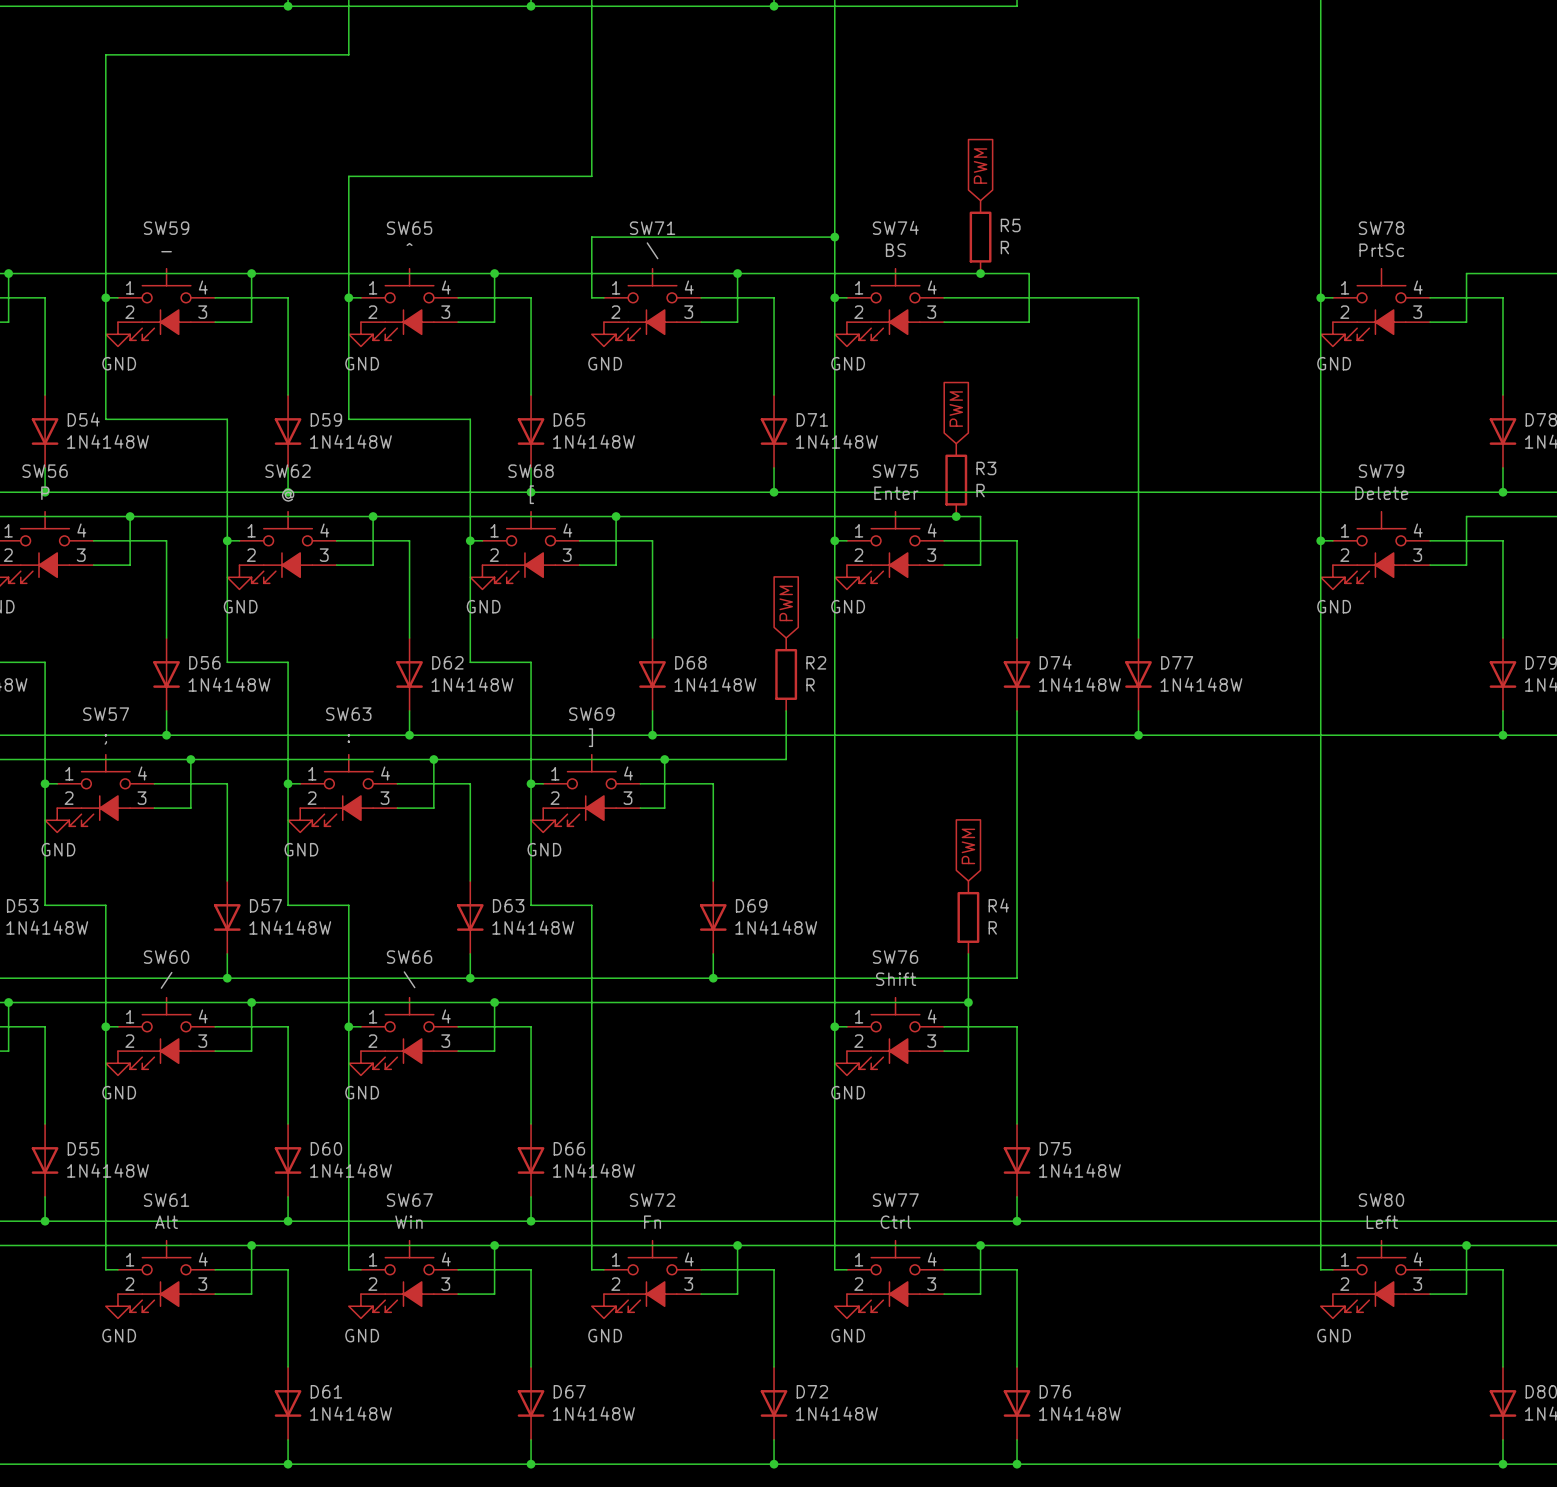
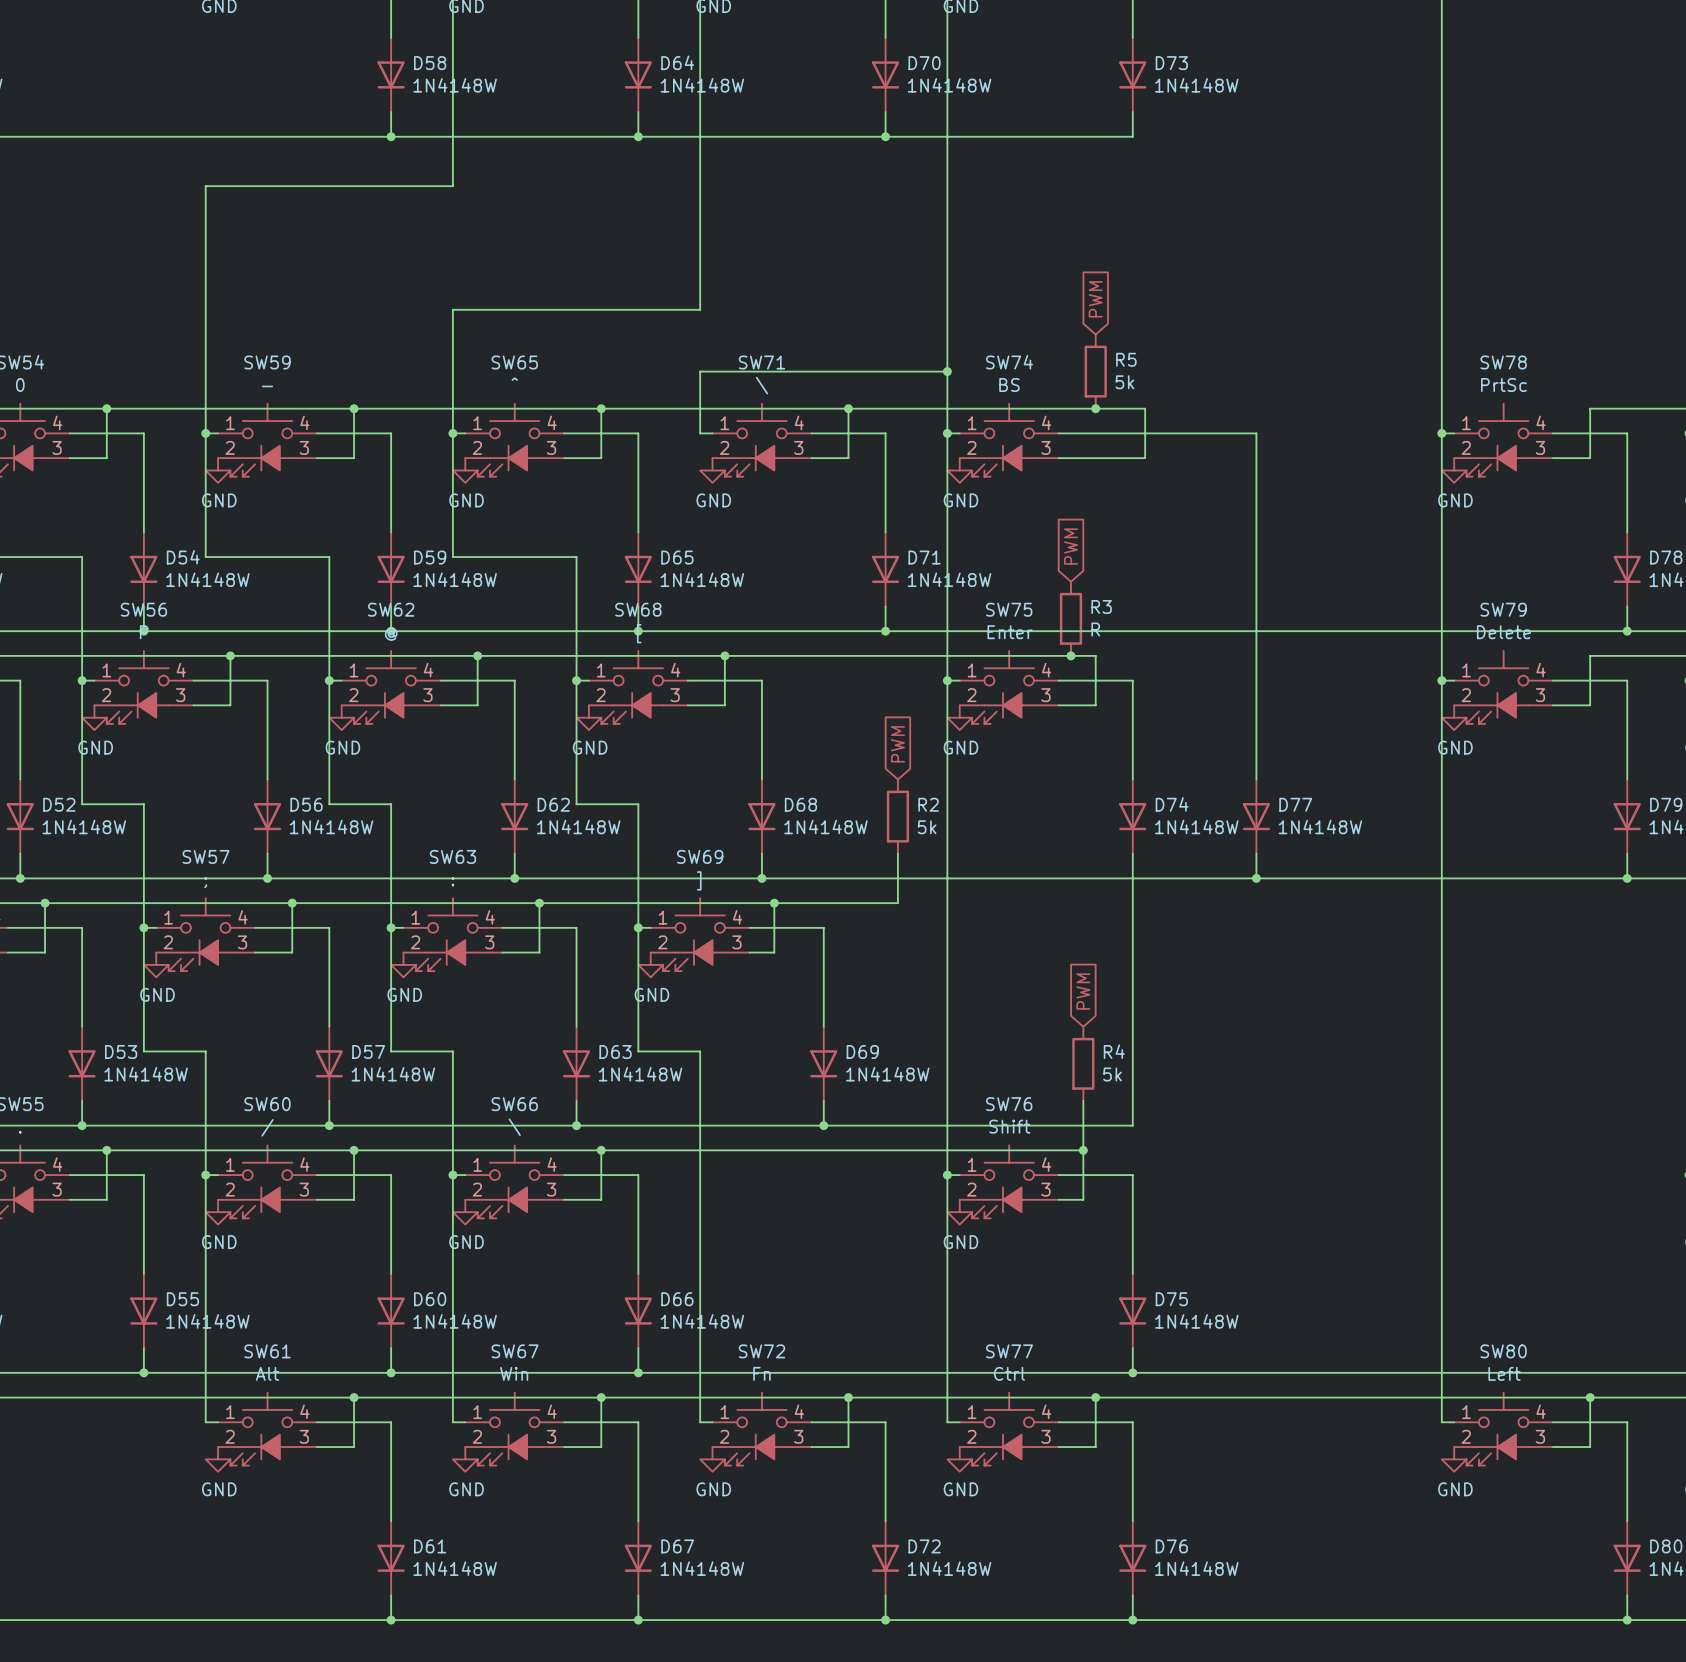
R5 value: R (1004, 247) -> 5k (1124, 382)
R2 value: R (810, 684) -> 5k (927, 827)
R4 value: R (992, 927) -> 5k (1112, 1074)

